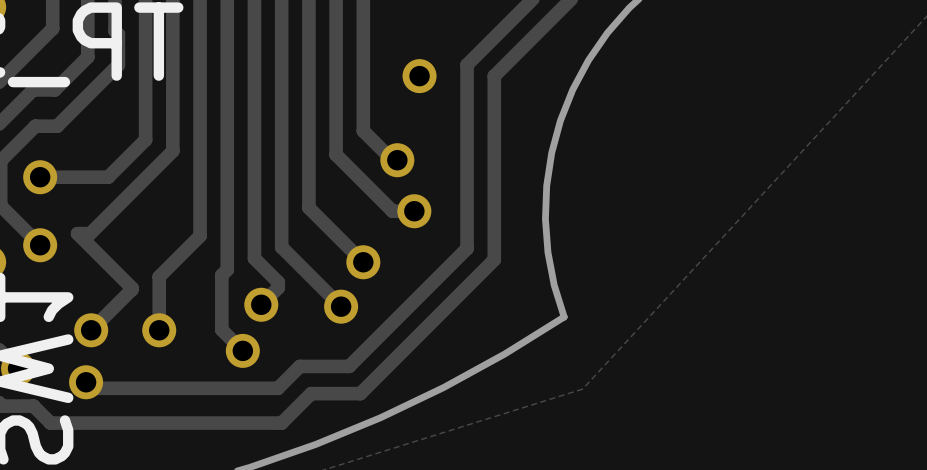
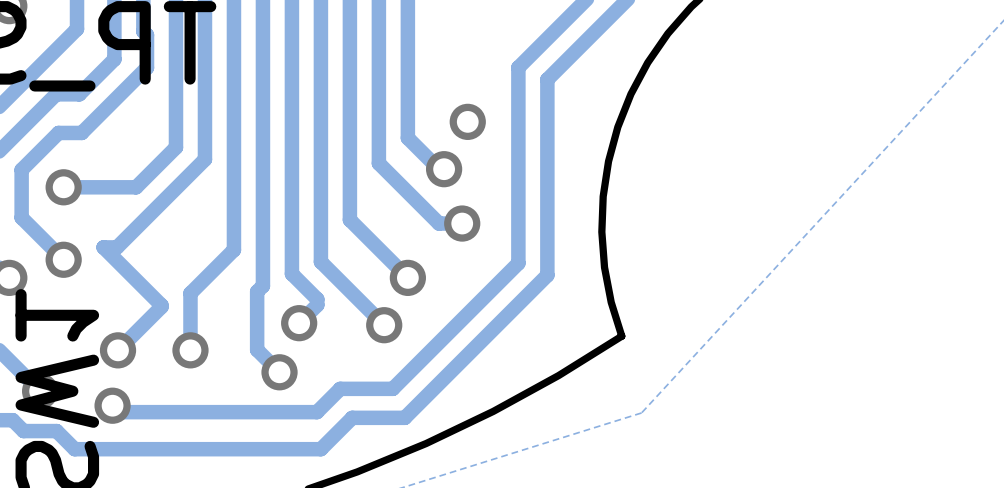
via position: (419, 76) -> (467, 121)

